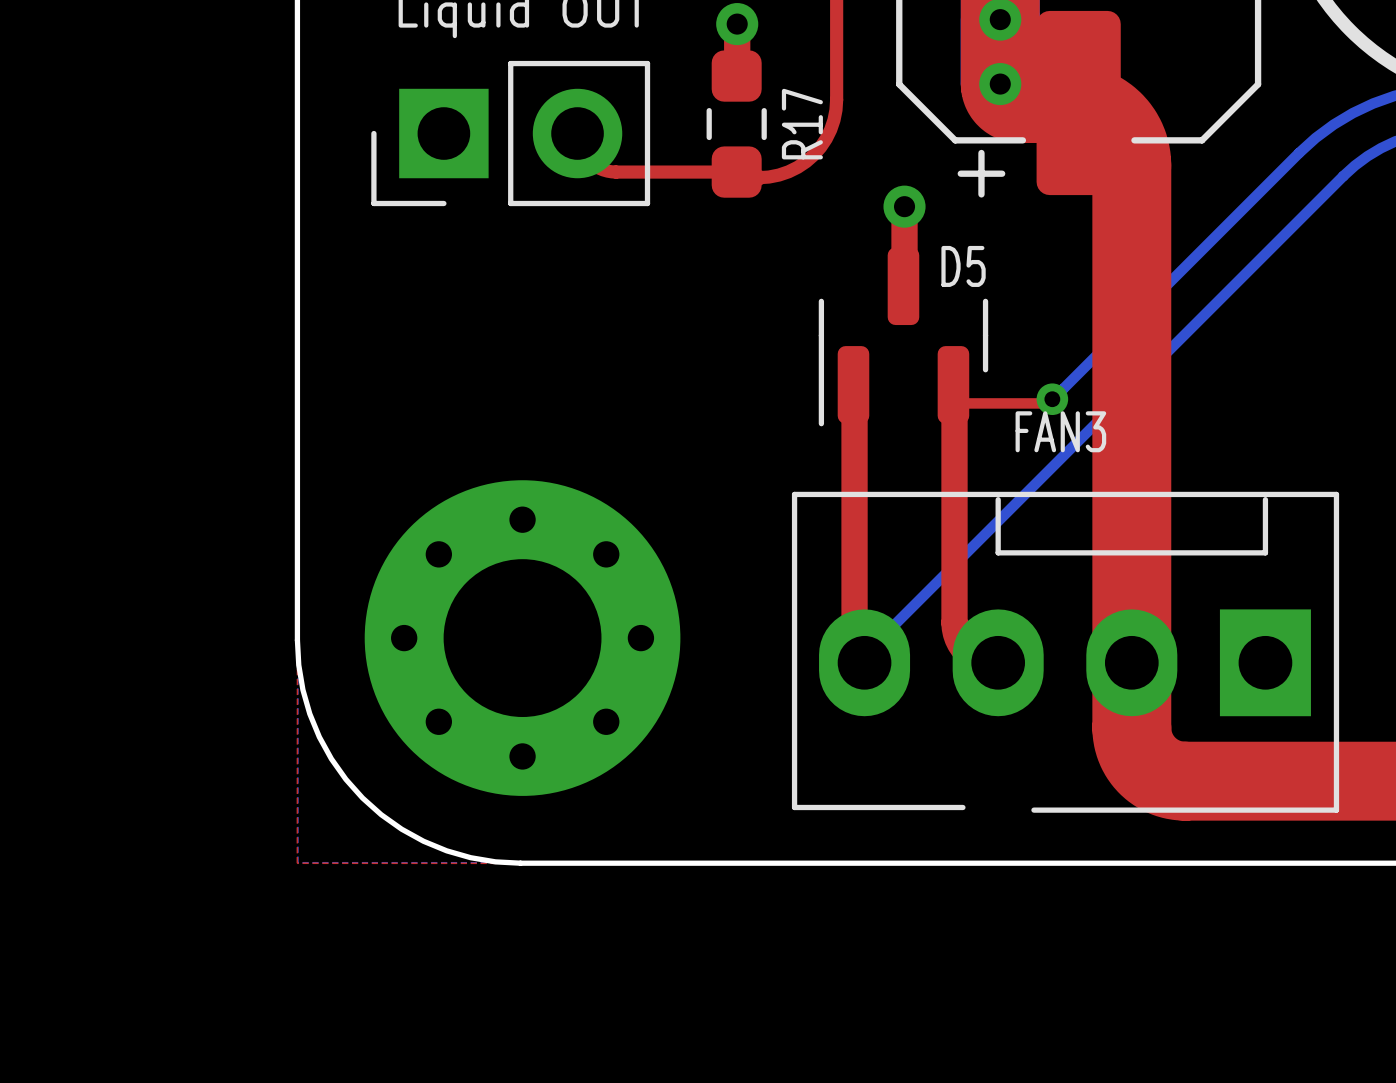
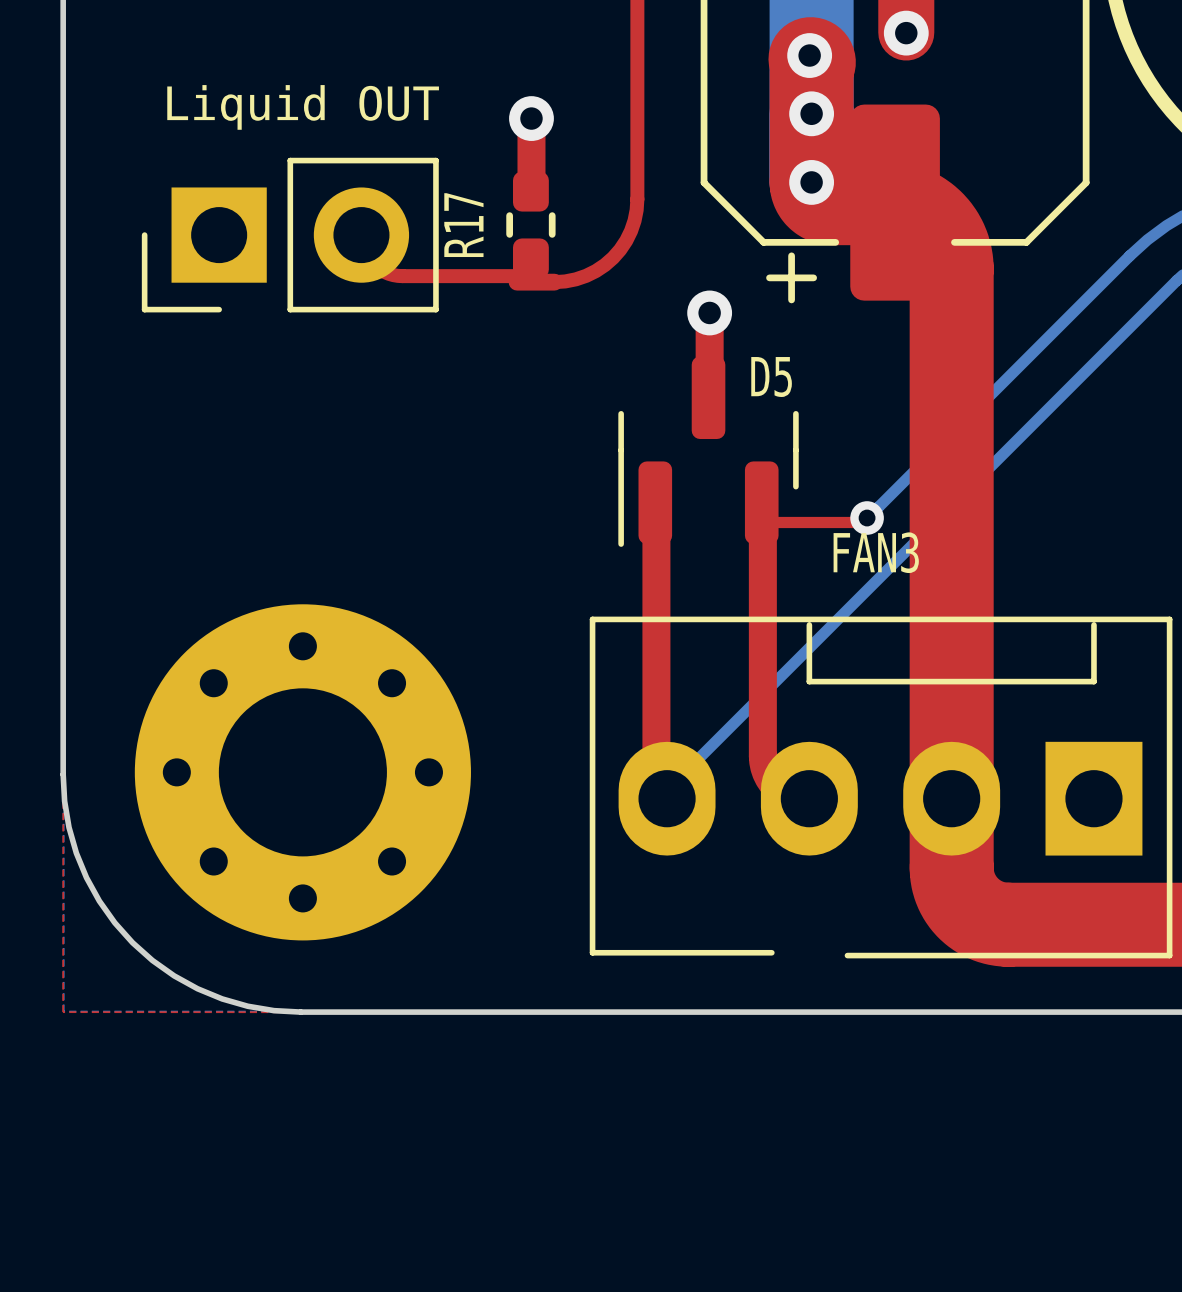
R17 footprint: [706, 50, 767, 198] -> [506, 171, 556, 279]
R17 name position: R17 (802, 124) -> R17 (463, 225)

